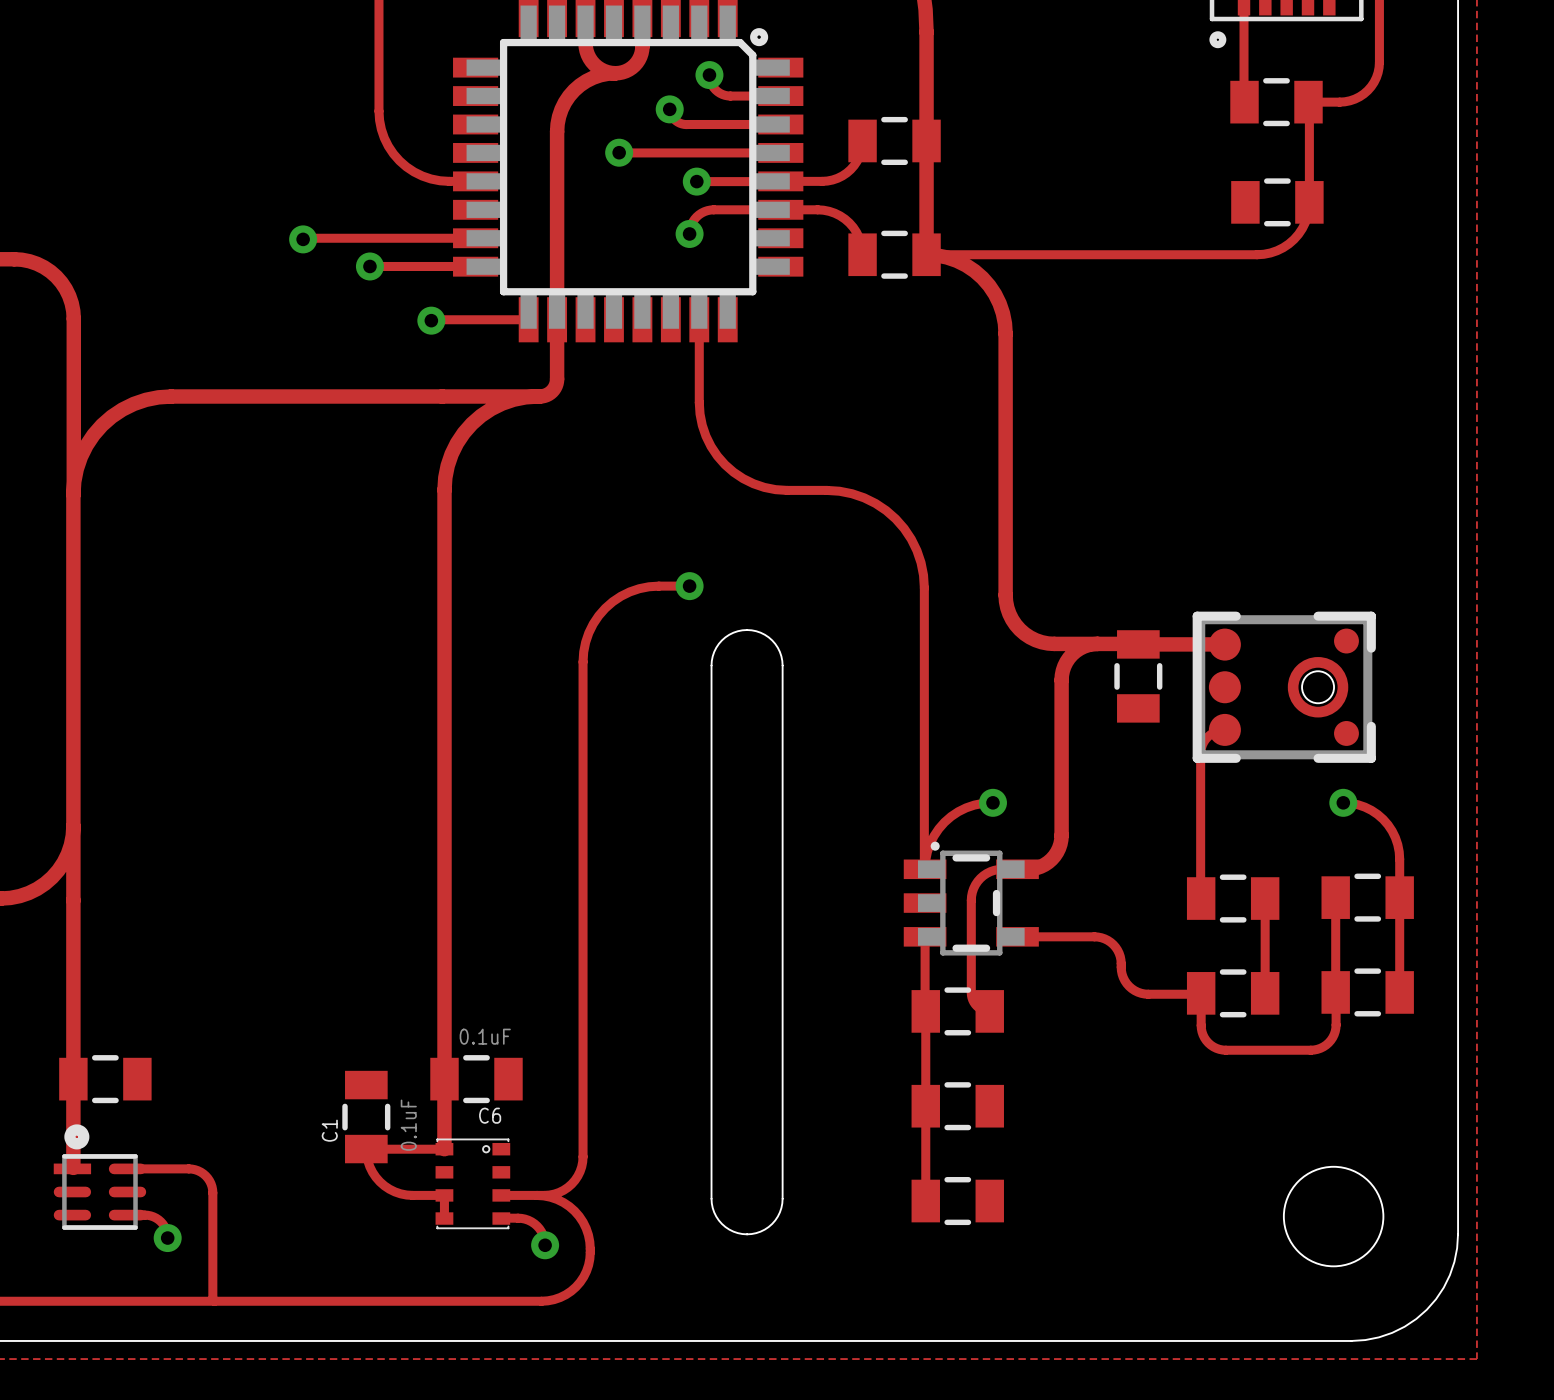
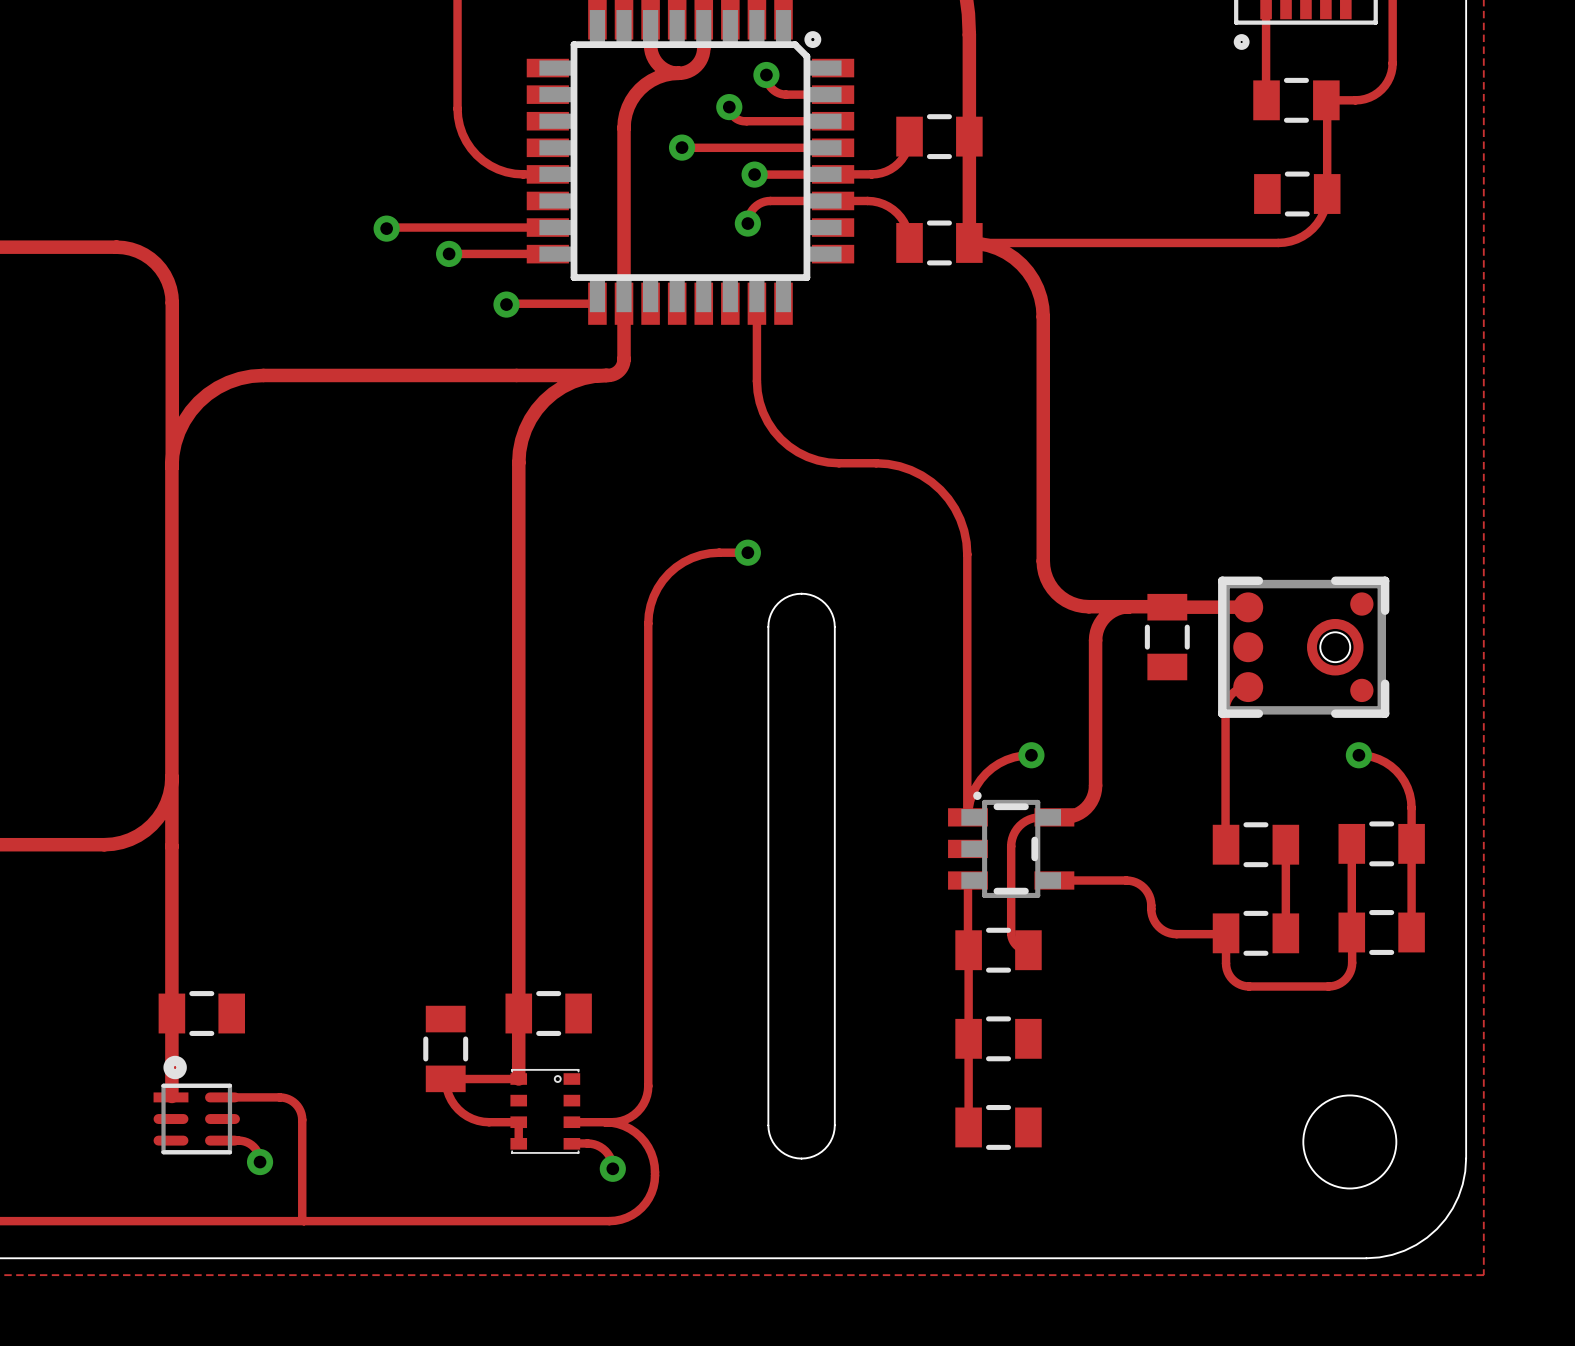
C6 value: 0.1uF (485, 1036) -> none
C6 name: C6 (490, 1115) -> none
C1 value: 0.1uF (408, 1125) -> none
C1 name: C1 (329, 1130) -> none

